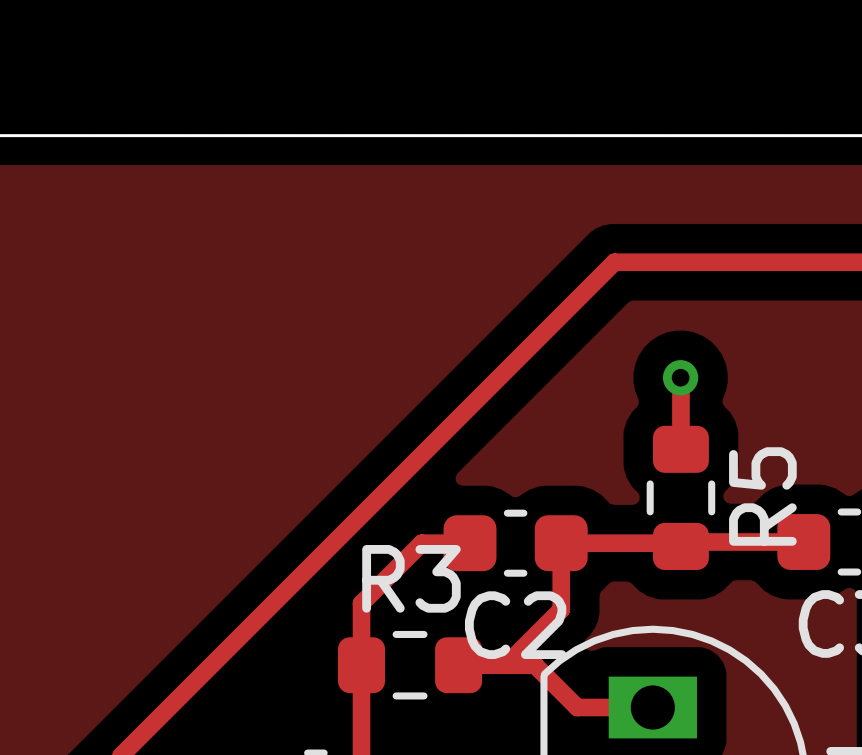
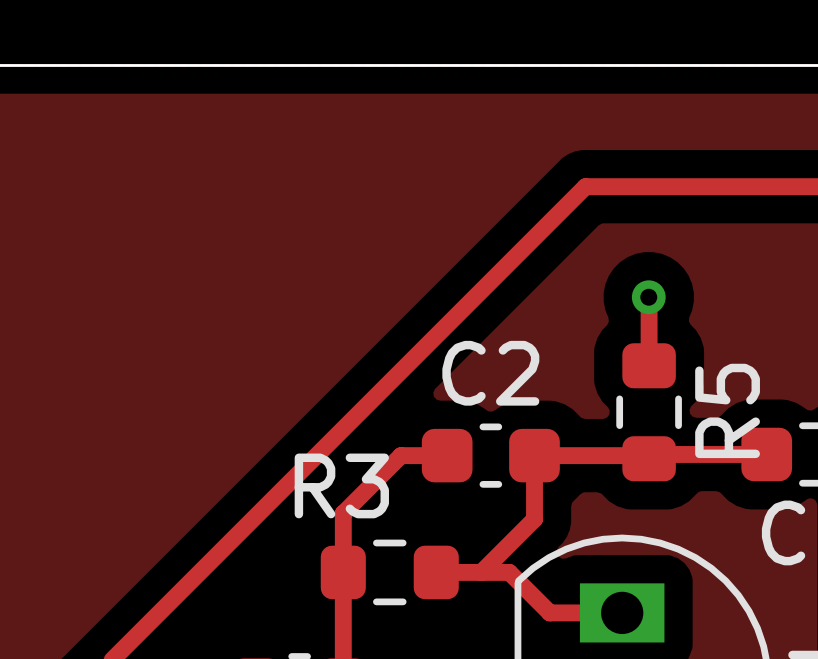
R3 name position: R3 (411, 578) -> R3 (341, 485)
C2 name position: C2 (515, 625) -> C2 (490, 373)

